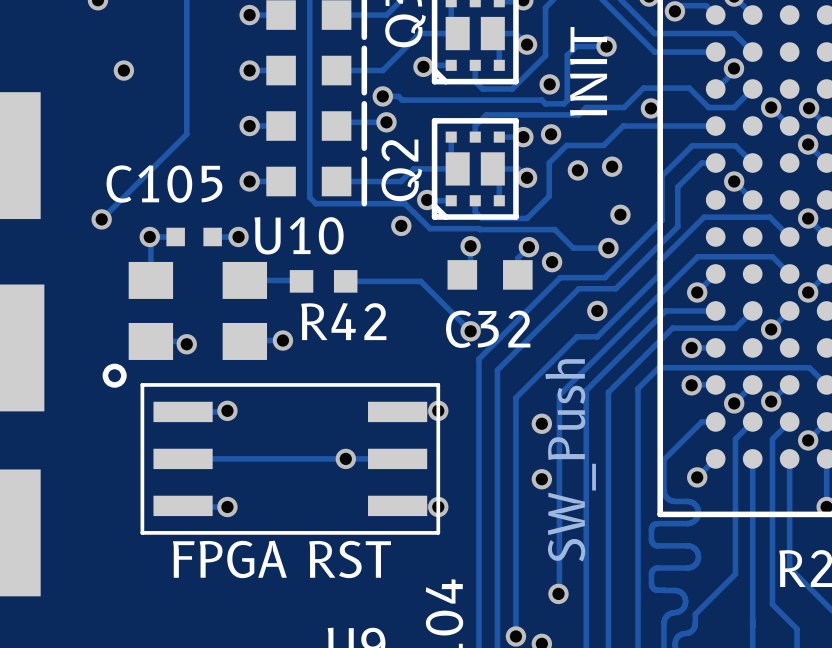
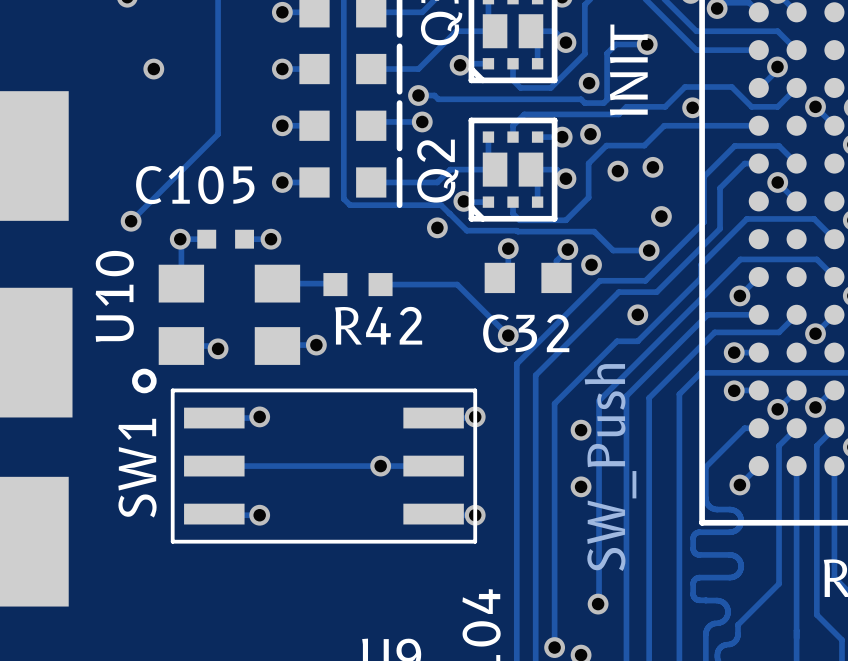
U10 name rotation: 0° (299, 235) -> 90° counterclockwise (114, 296)
U10 name position: U10 (299, 235) -> U10 (114, 296)
SW1 name: none -> SW1 (137, 468)
text: FPGA RST (282, 559) -> none

